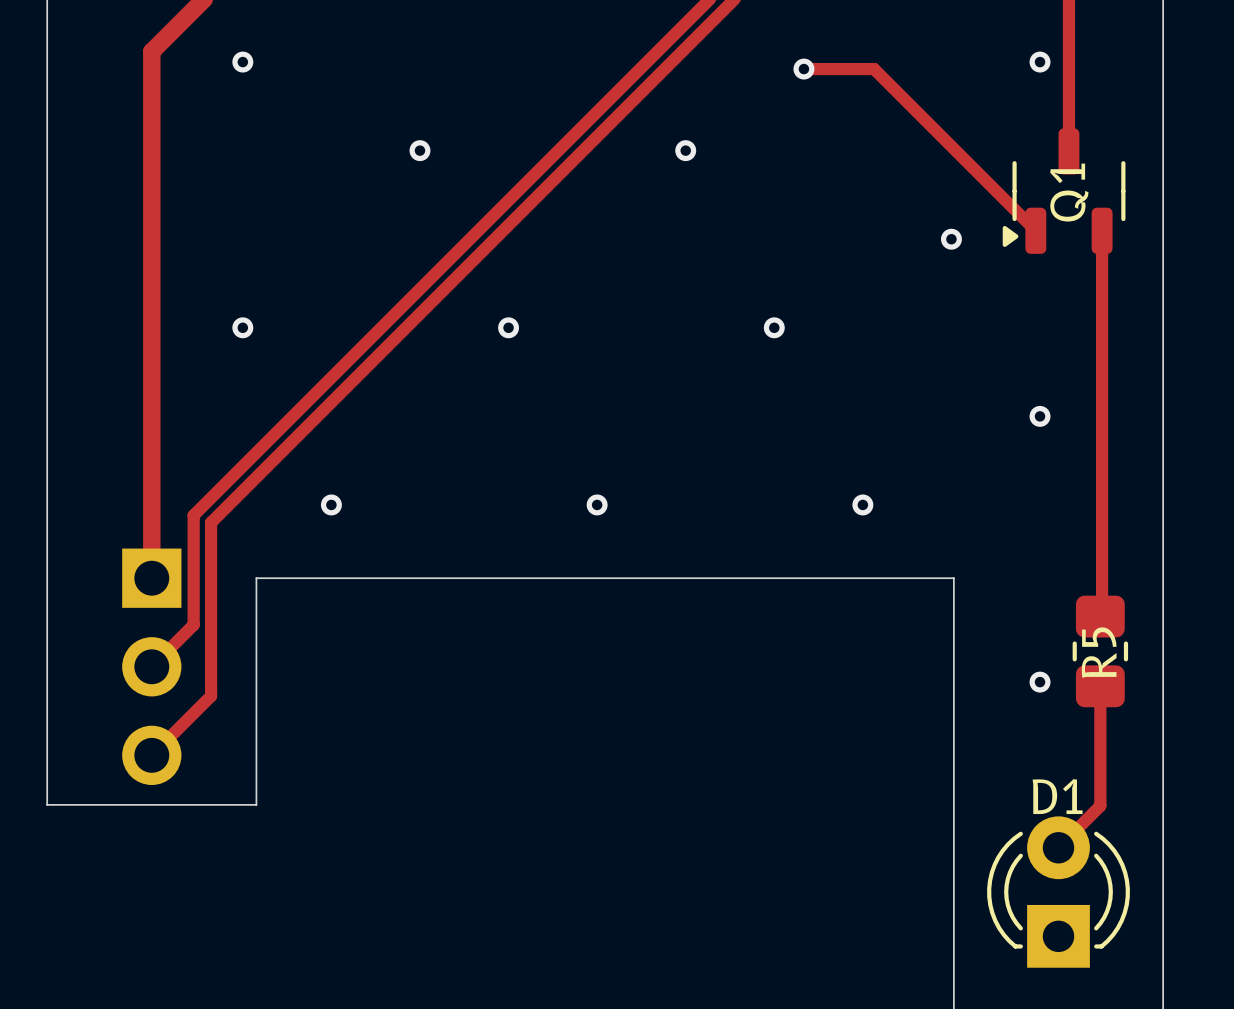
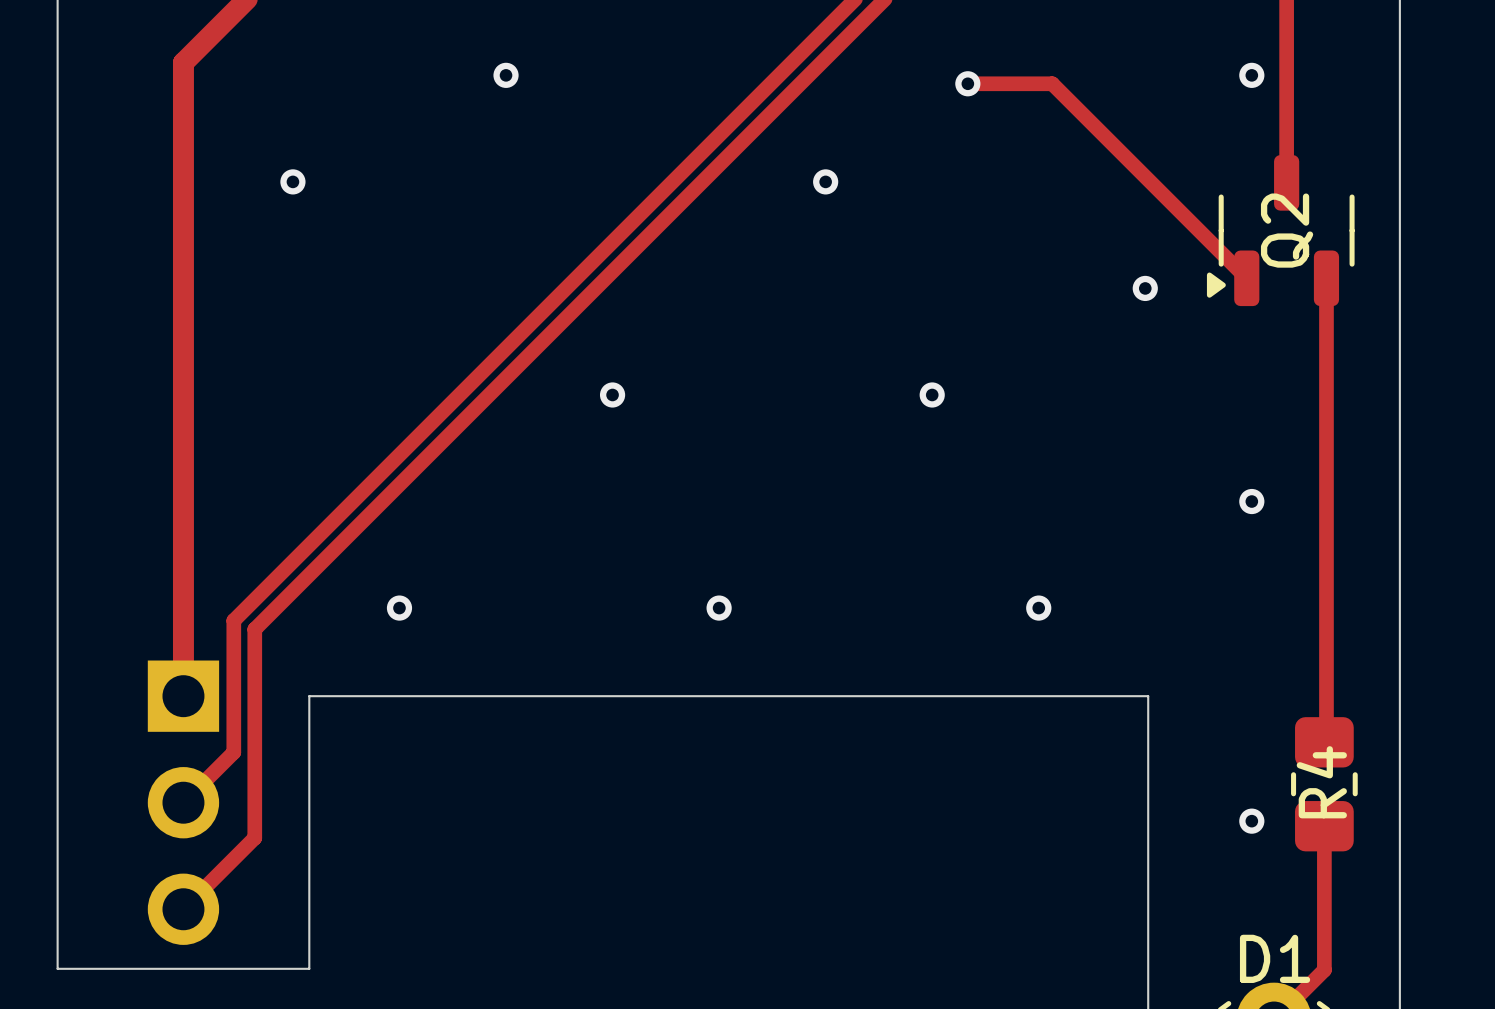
via: (242, 62) -> none
via: none -> (506, 75)
via: none -> (292, 181)
via: (419, 150) -> none
Q1 name: Q1 (1069, 192) -> Q2 (1287, 230)
via: (242, 327) -> none
R5 name: R5 (1099, 652) -> R4 (1321, 782)

